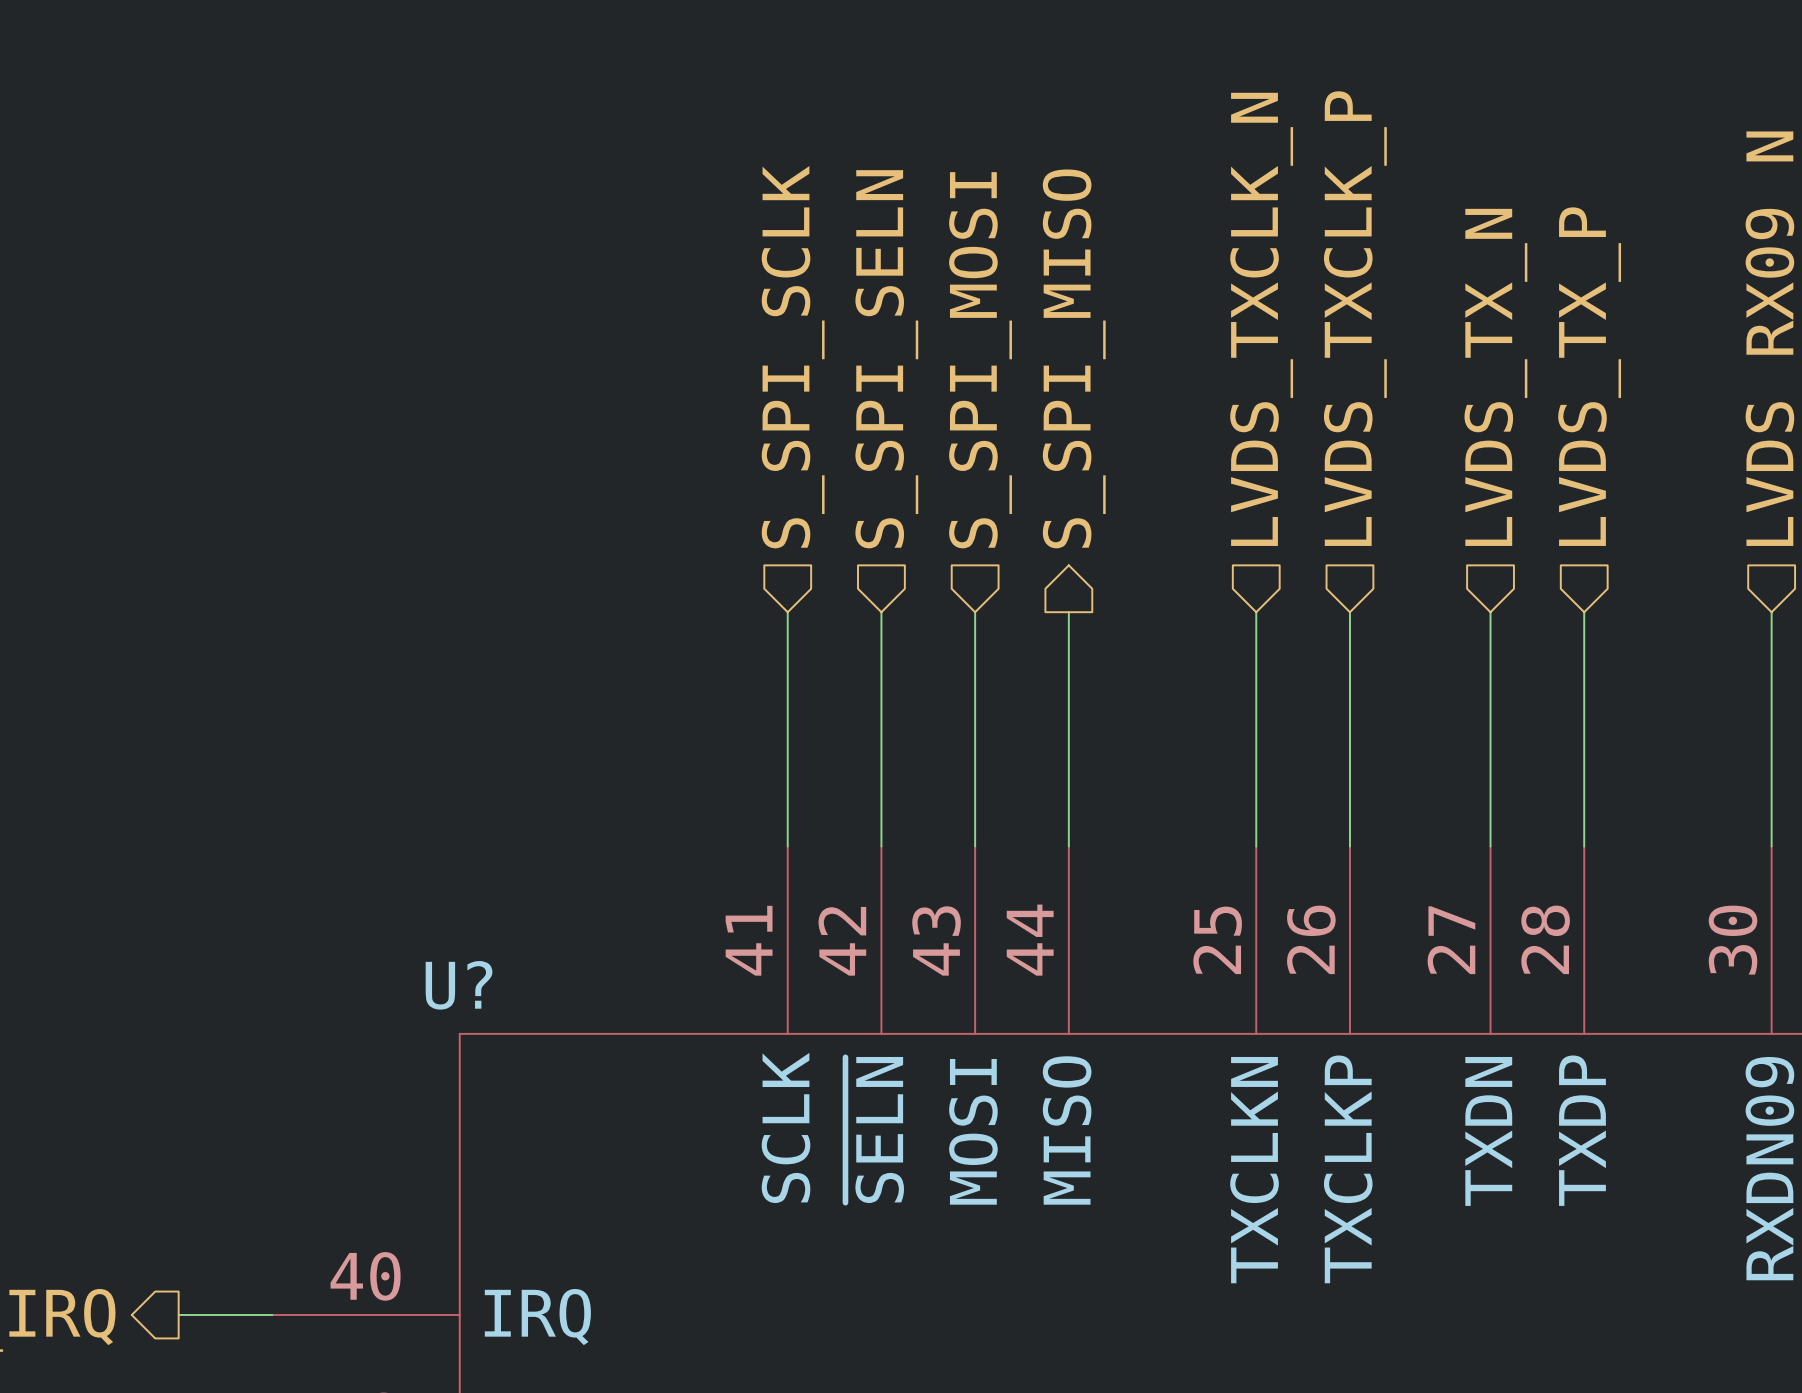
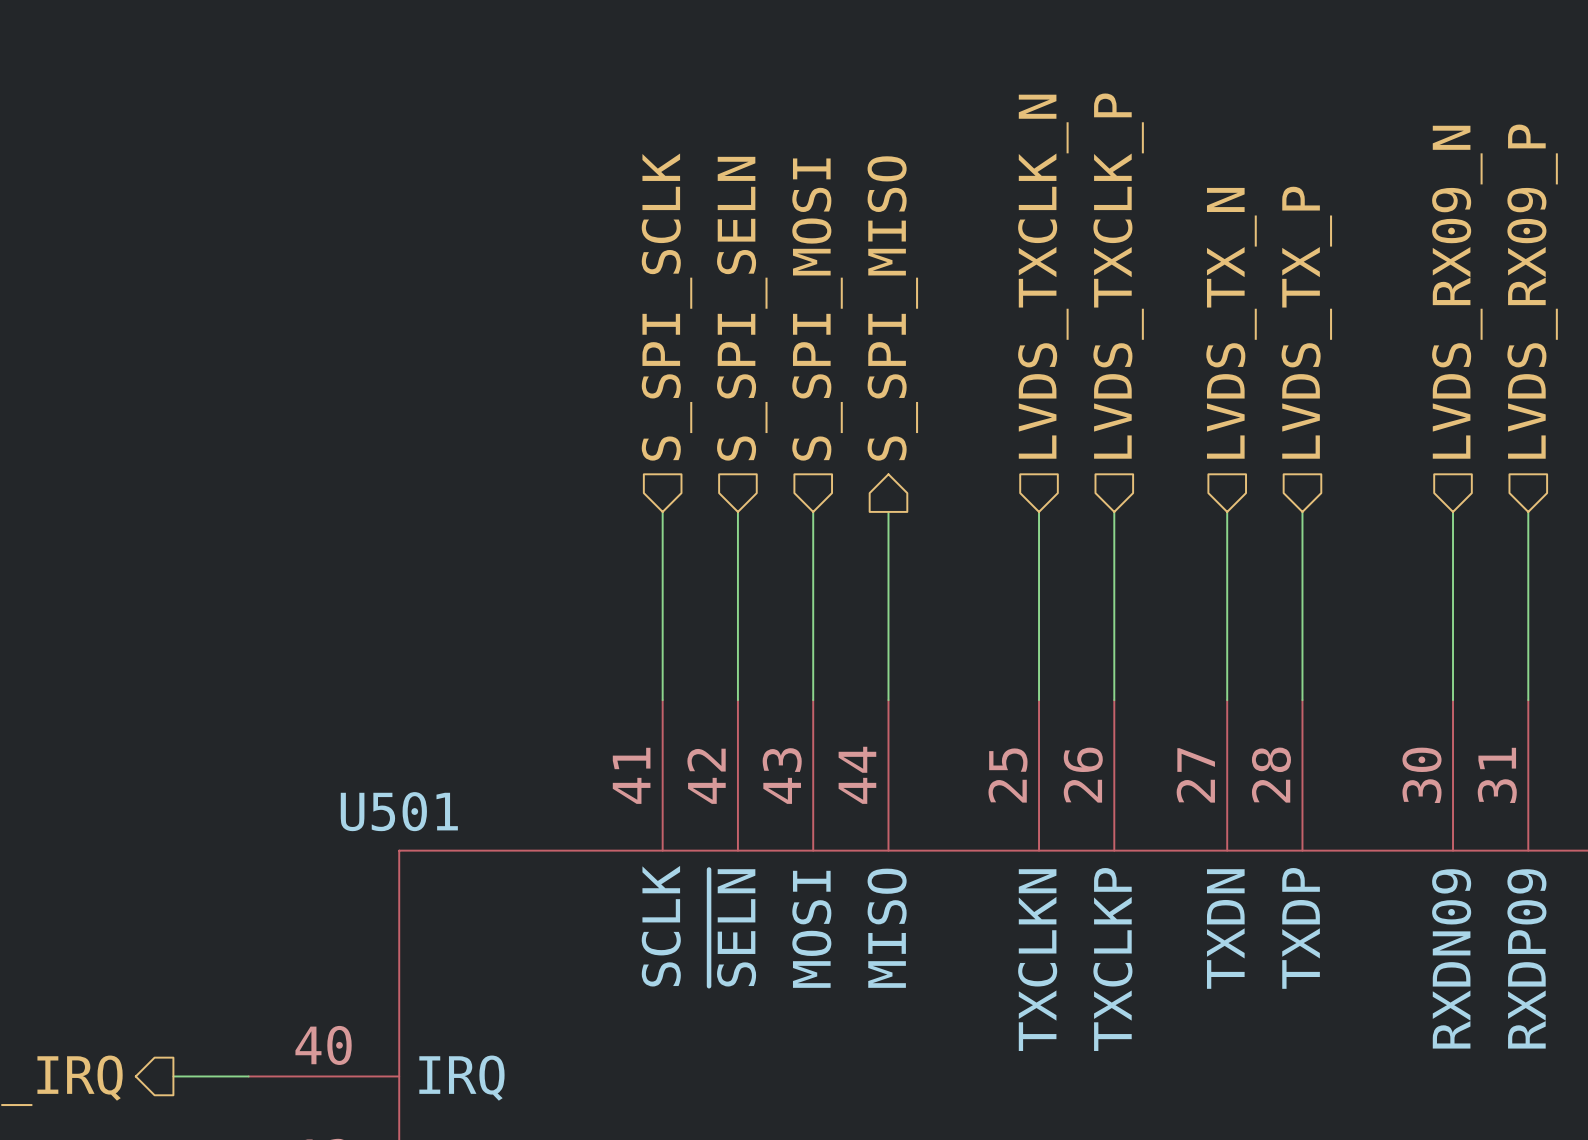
U? name: U? (459, 985) -> U501 (399, 811)

